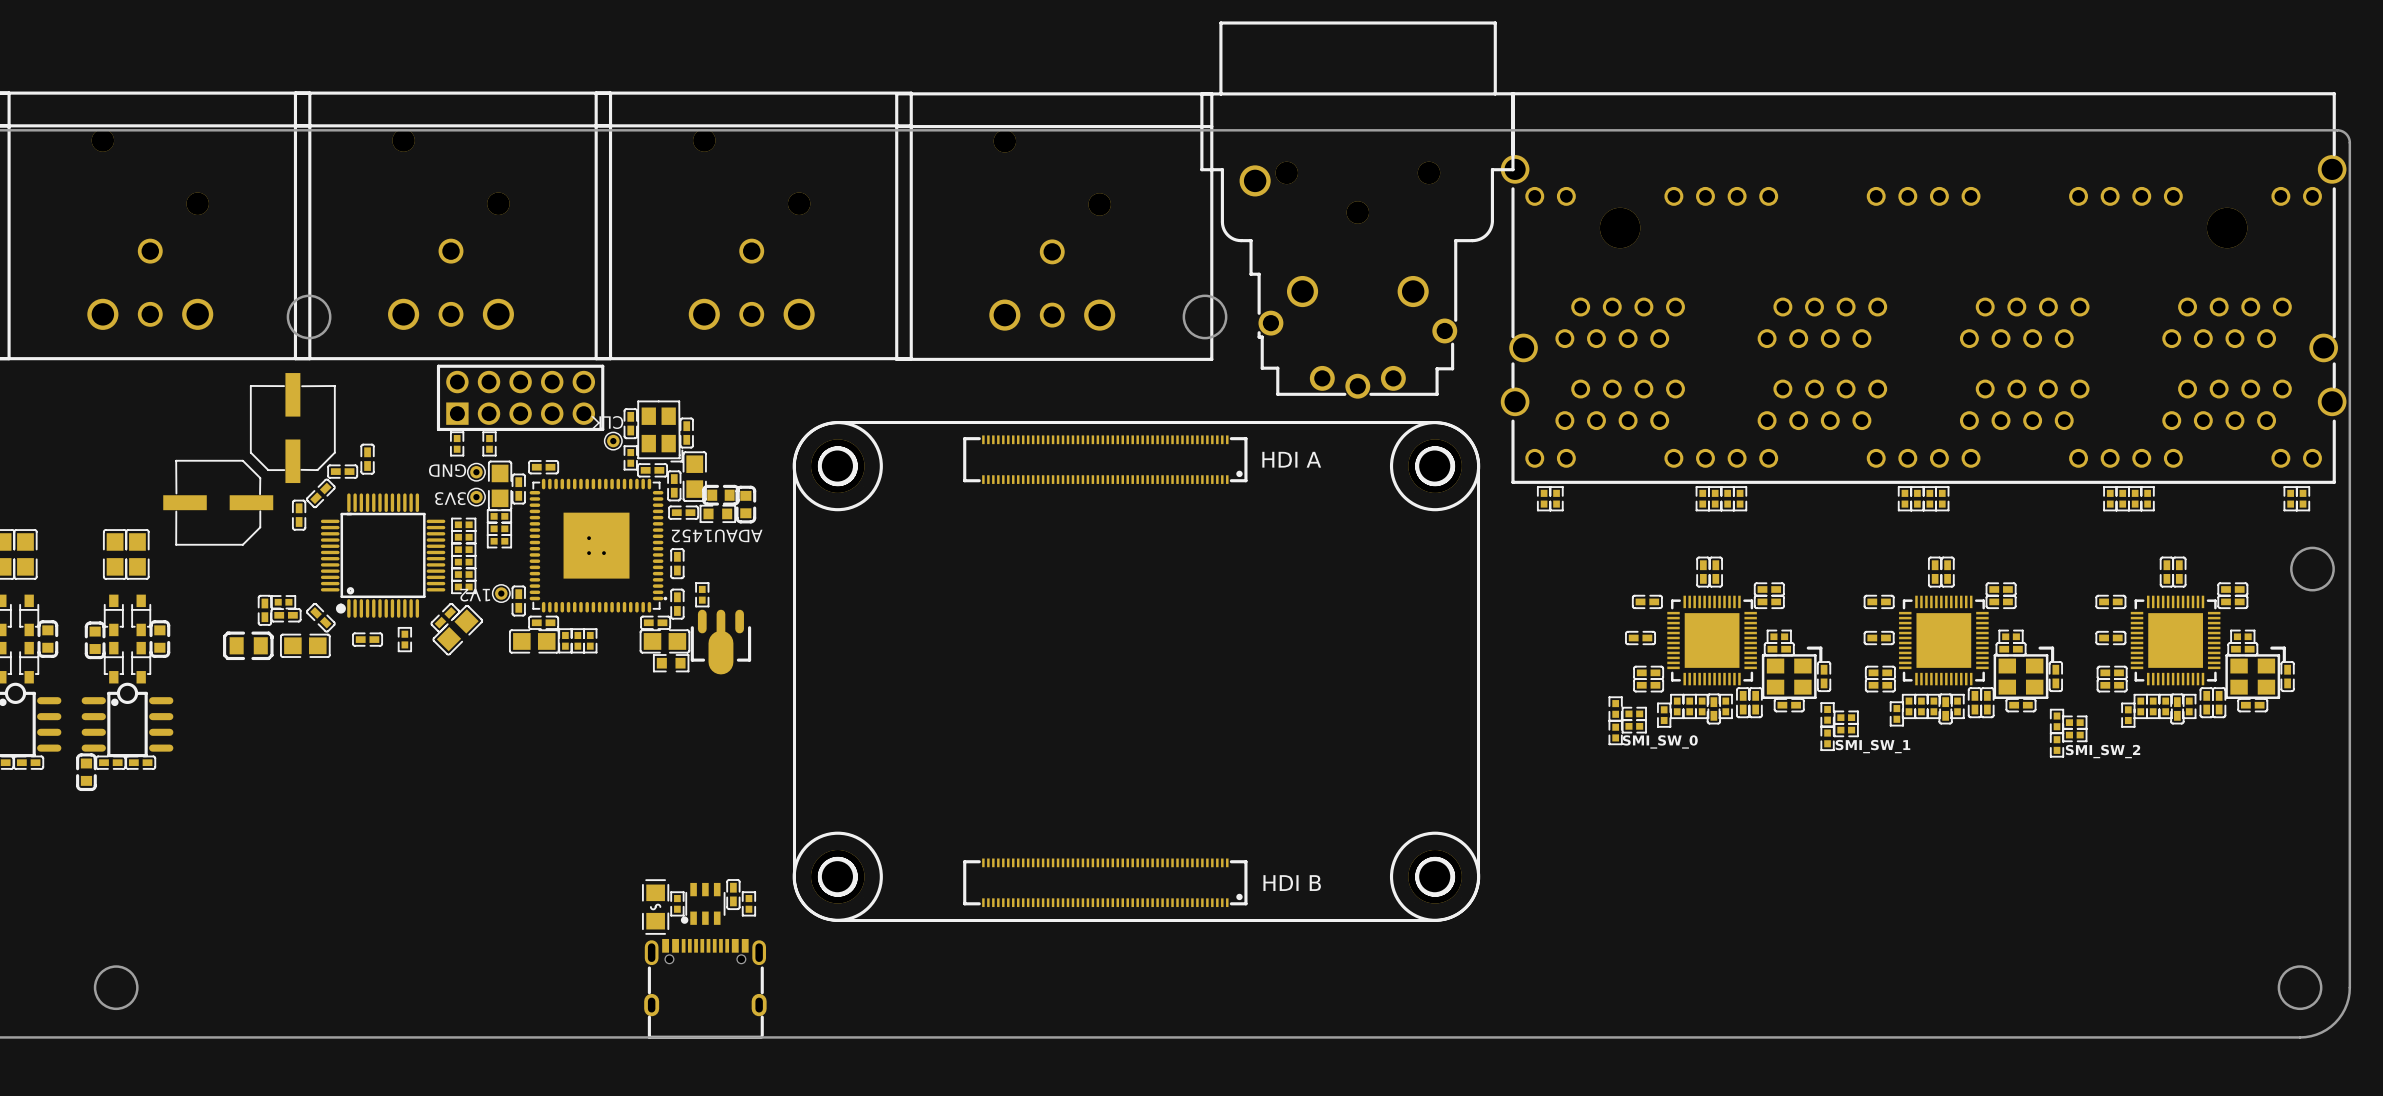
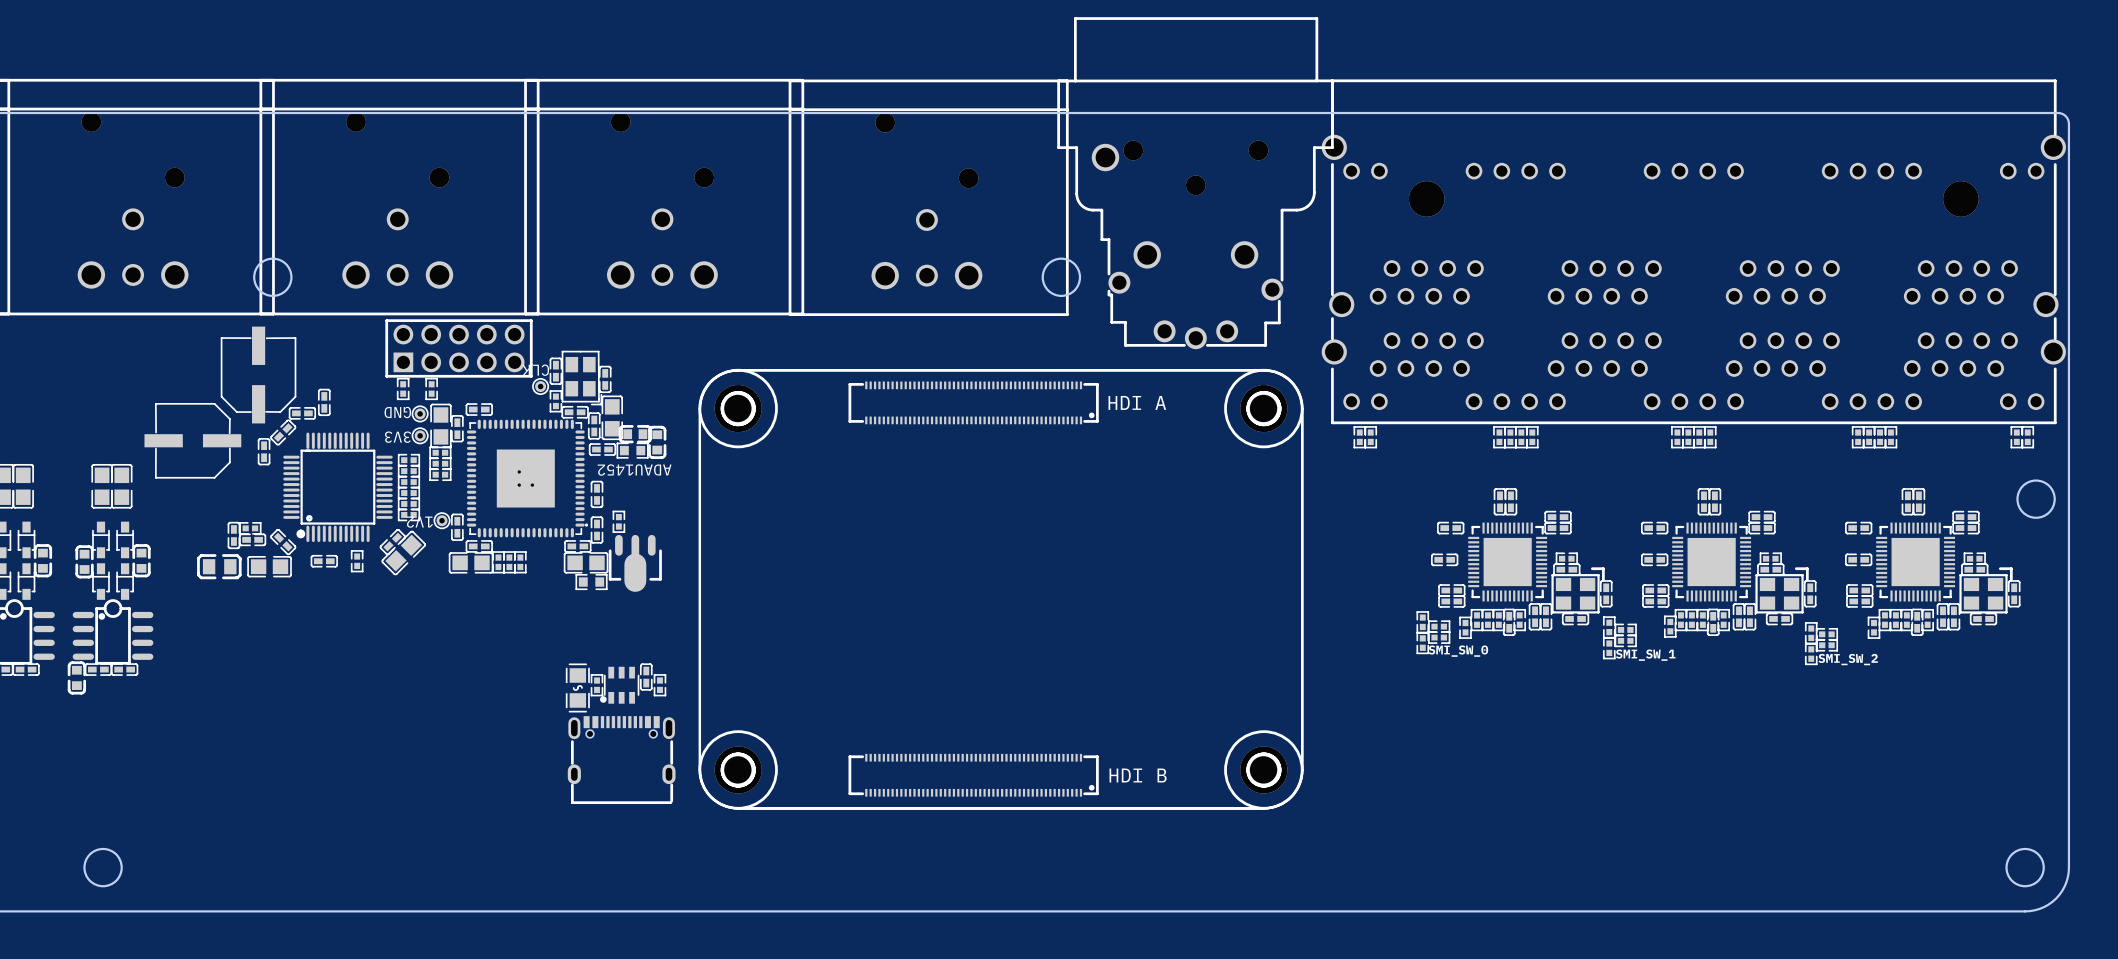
part: none -> (597, 685)
part: none -> (659, 685)
part position: (733, 894) -> (646, 677)
part: (677, 903) -> none
part position: (703, 903) -> (619, 685)
part: (748, 903) -> none
part position: (655, 907) -> (577, 687)
part position: (705, 988) -> (621, 760)

